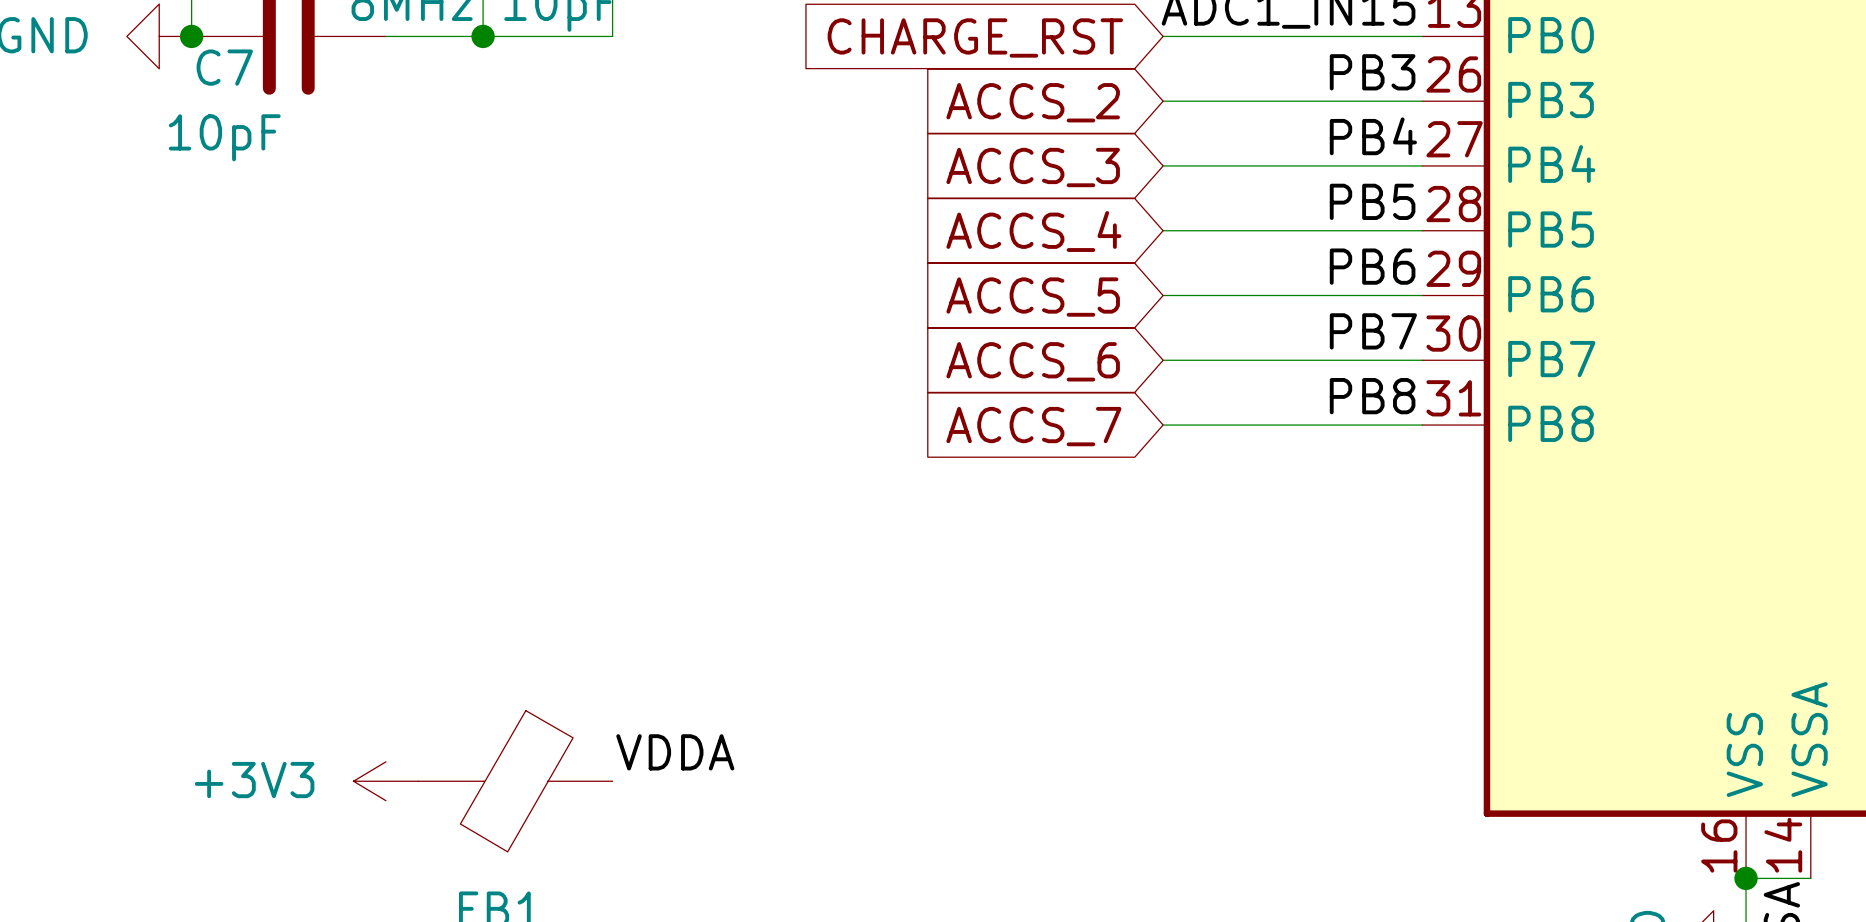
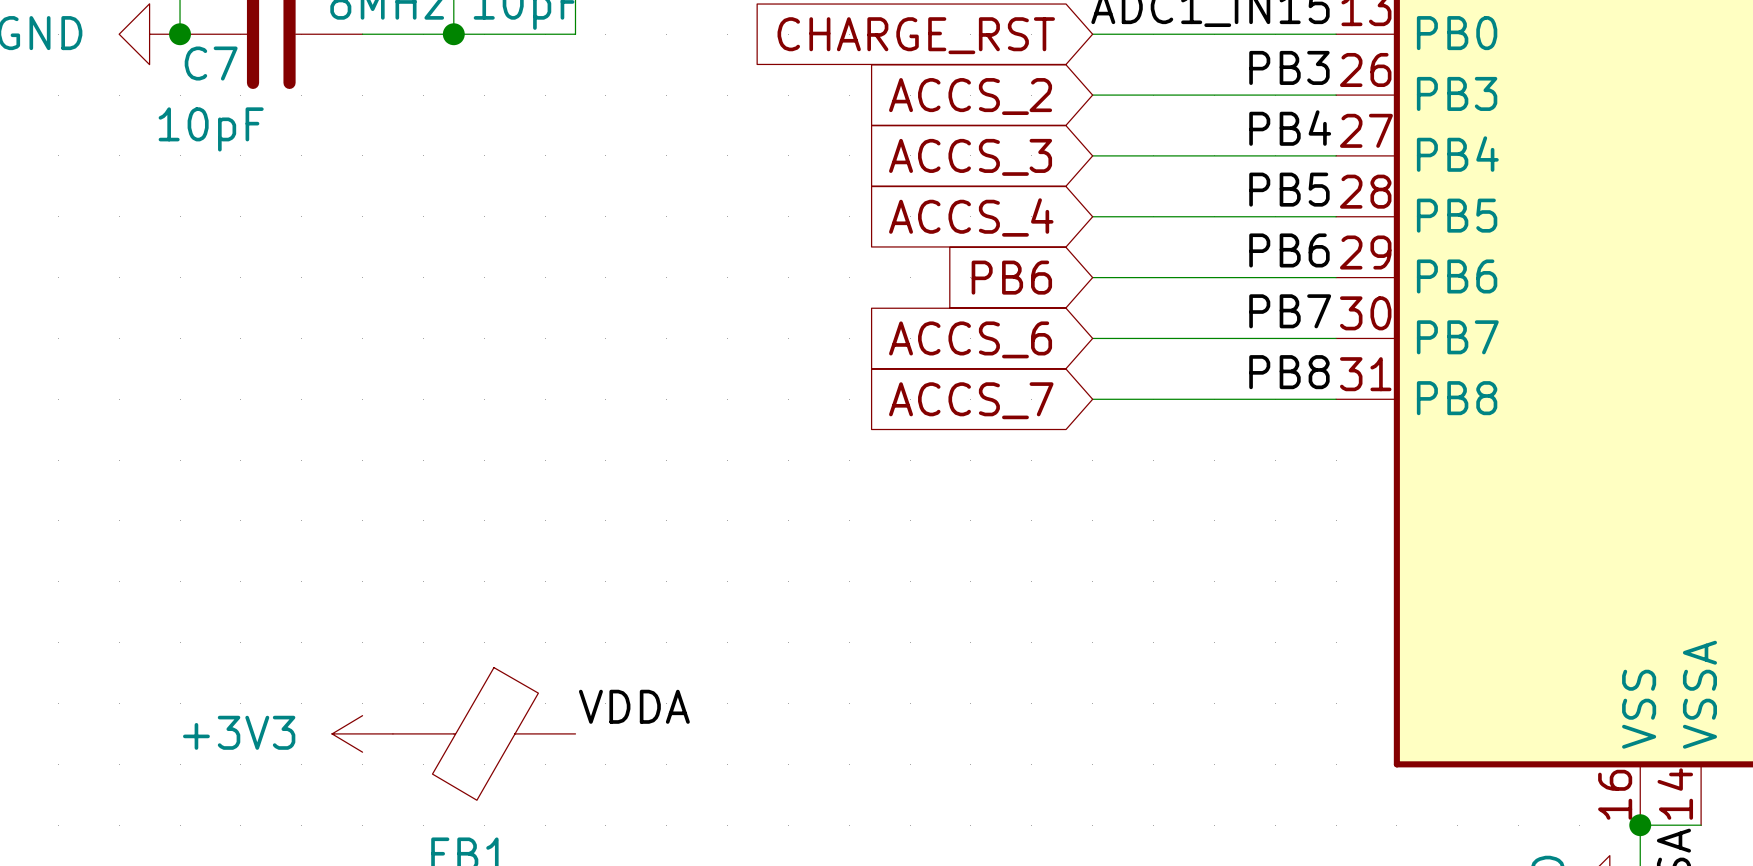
global label: ACCS_5 (1033, 297) -> PB6 (1011, 277)

